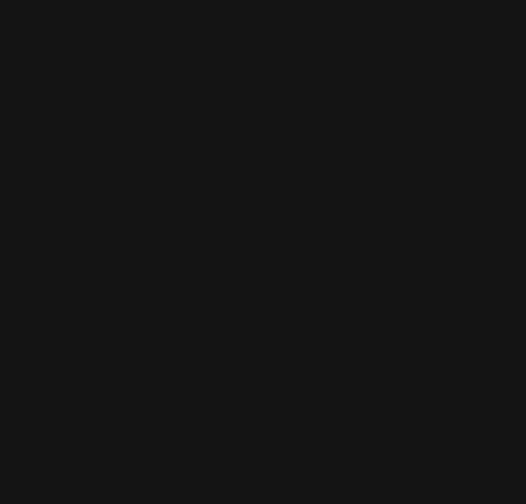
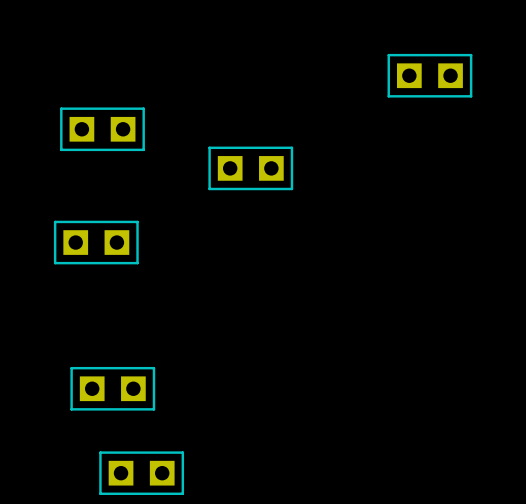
part: none -> (429, 75)
part: none -> (102, 129)
part: none -> (250, 168)
part: none -> (96, 242)
part: none -> (112, 388)
part: none -> (141, 473)

